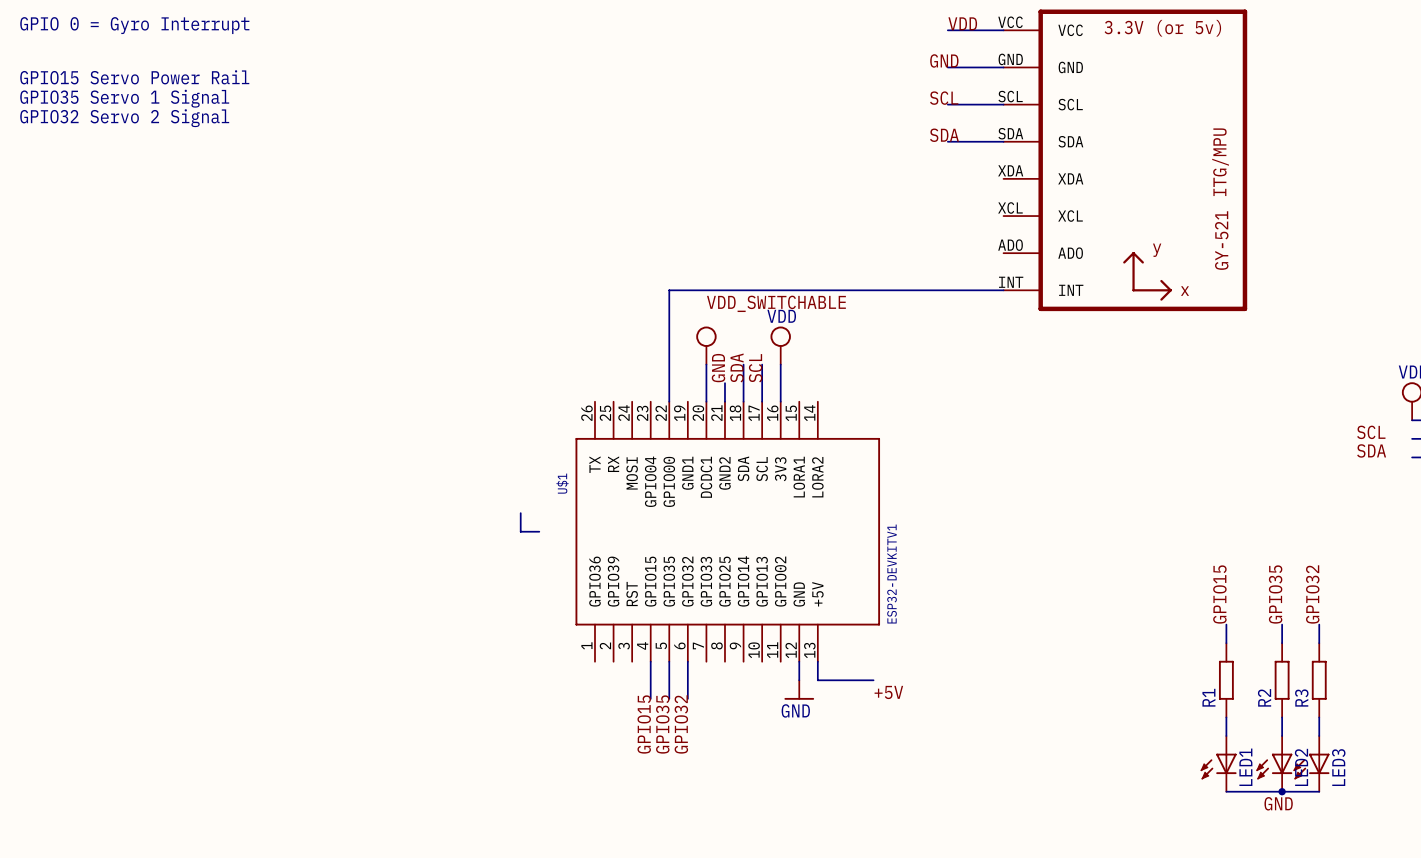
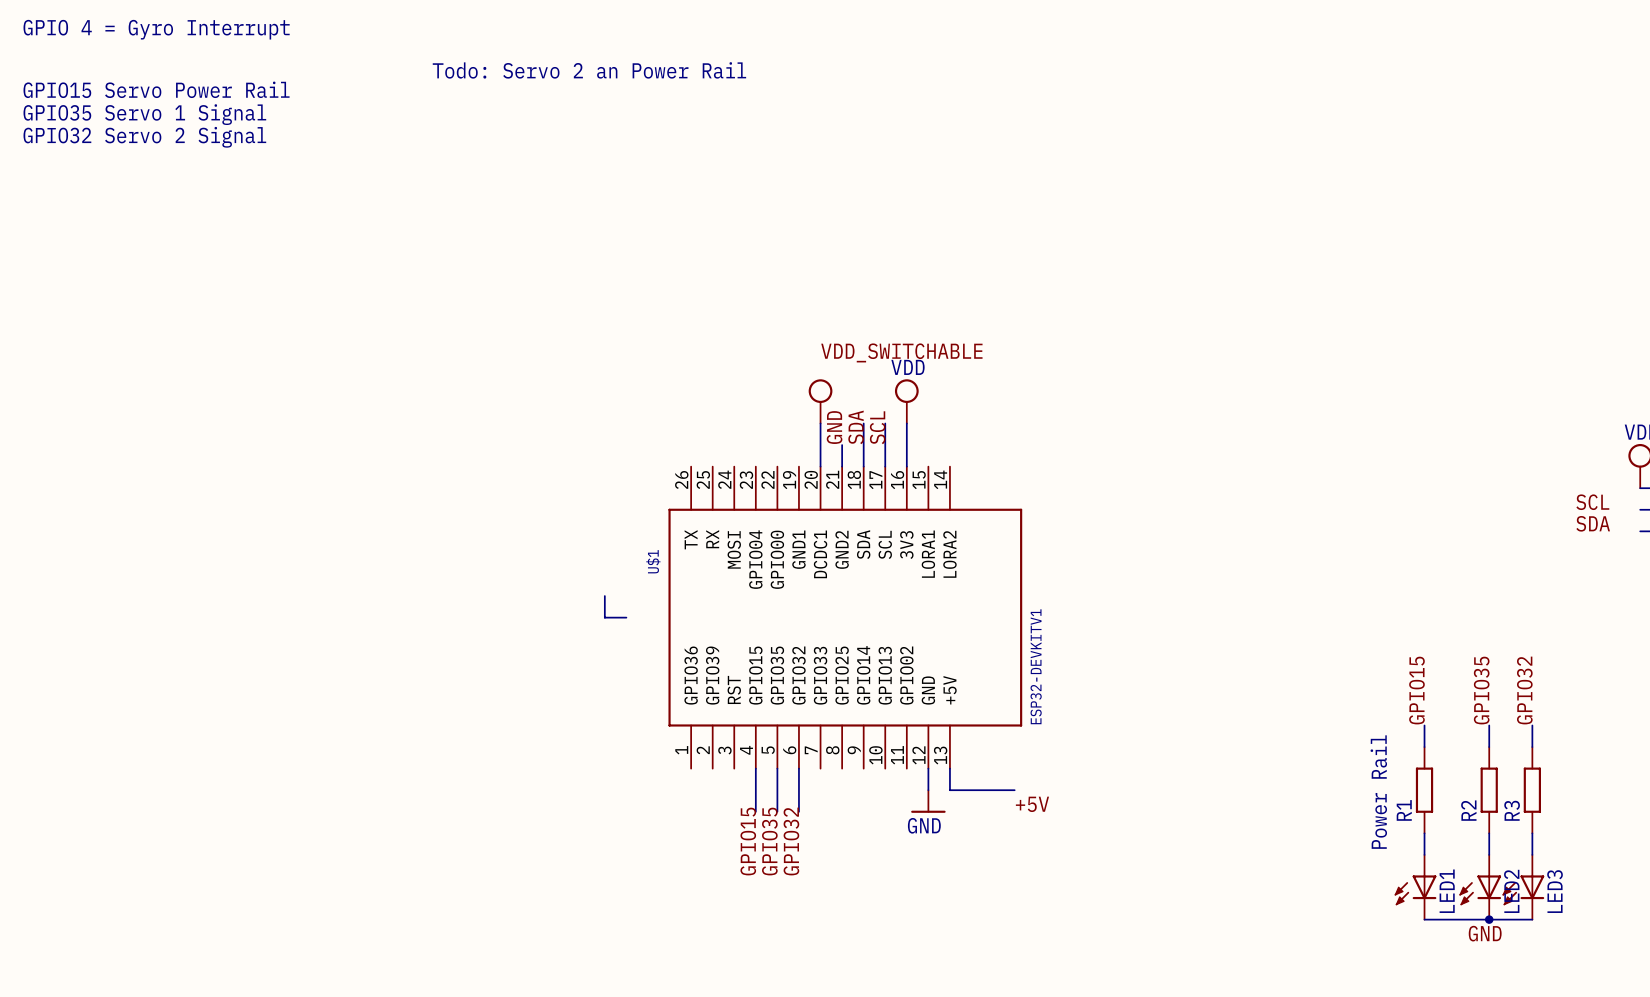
label: VDD (962, 23) -> none
text: GPIO 0 = Gyro Interrupt (134, 25) -> GPIO 4 = Gyro Interrupt (156, 29)
wire: (947, 30) (1003, 30) -> none
text: none -> Todo: Servo 2 an Power Rail (589, 70)
label: GND (944, 60) -> none
wire: (947, 67) (1003, 67) -> none
label: SCL (944, 98) -> none
wire: (947, 104) (1003, 104) -> none
label: SDA (944, 135) -> none
wire: (947, 141) (1003, 141) -> none
part: (1125, 160) -> none
wire: (1003, 290) (669, 290) (669, 401) -> none
LED1 value: none -> Power Rail (1378, 792)

